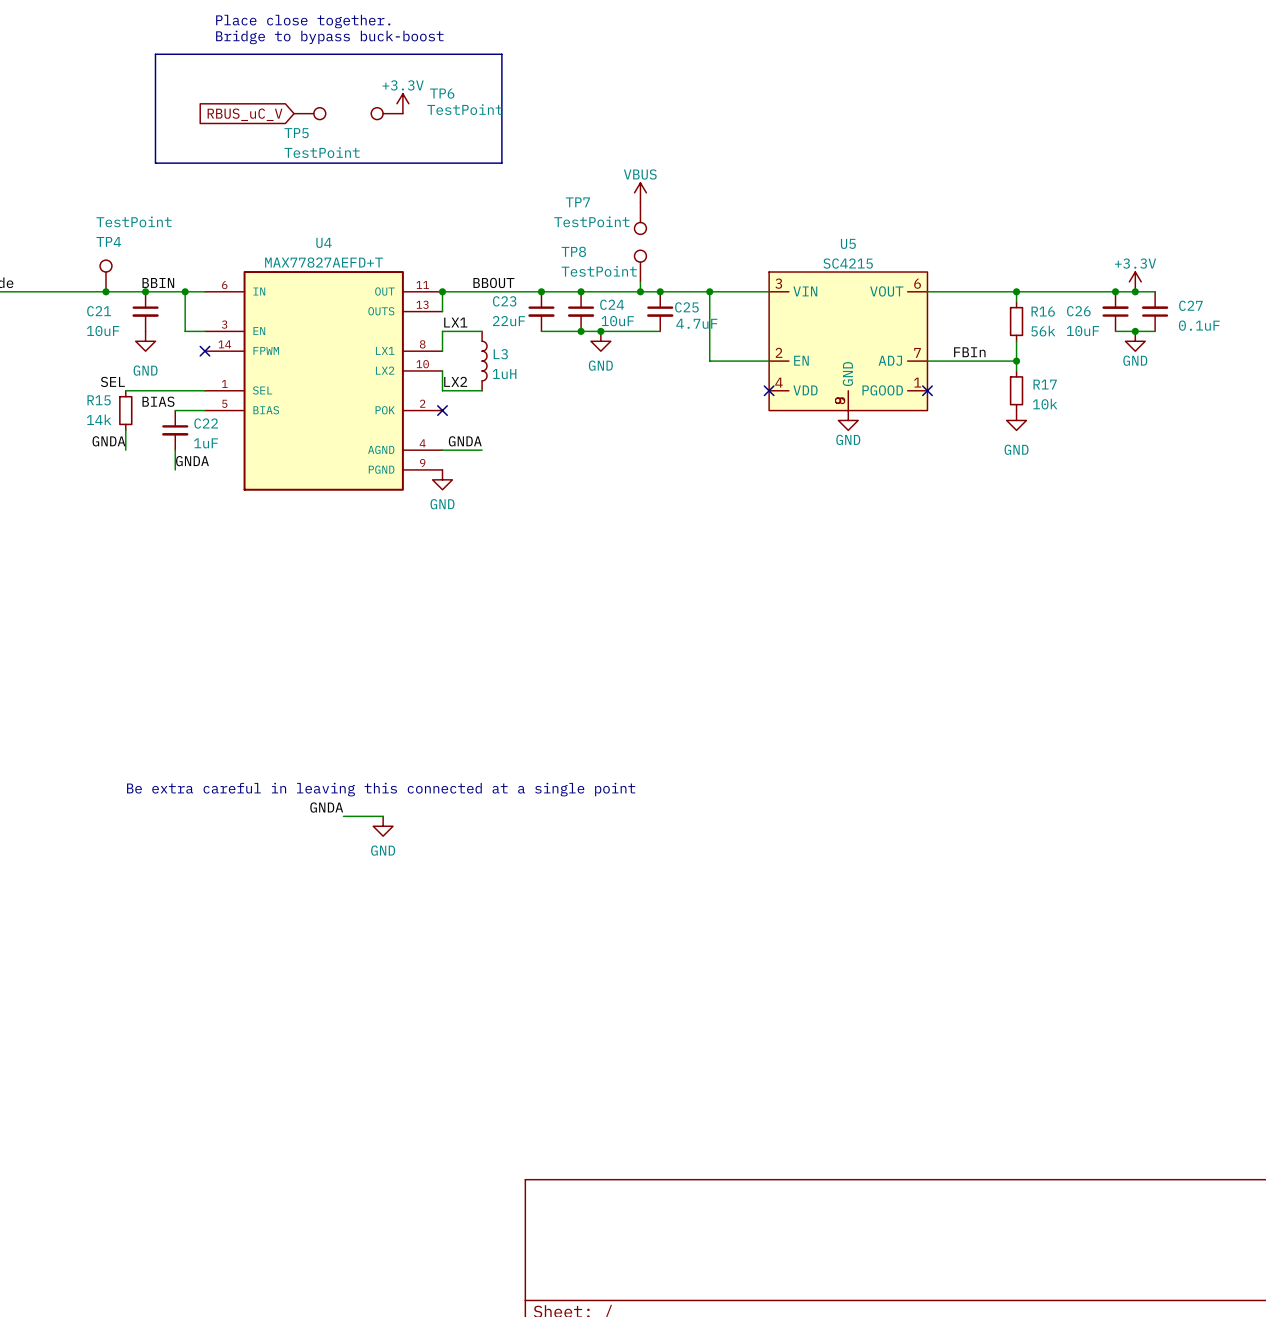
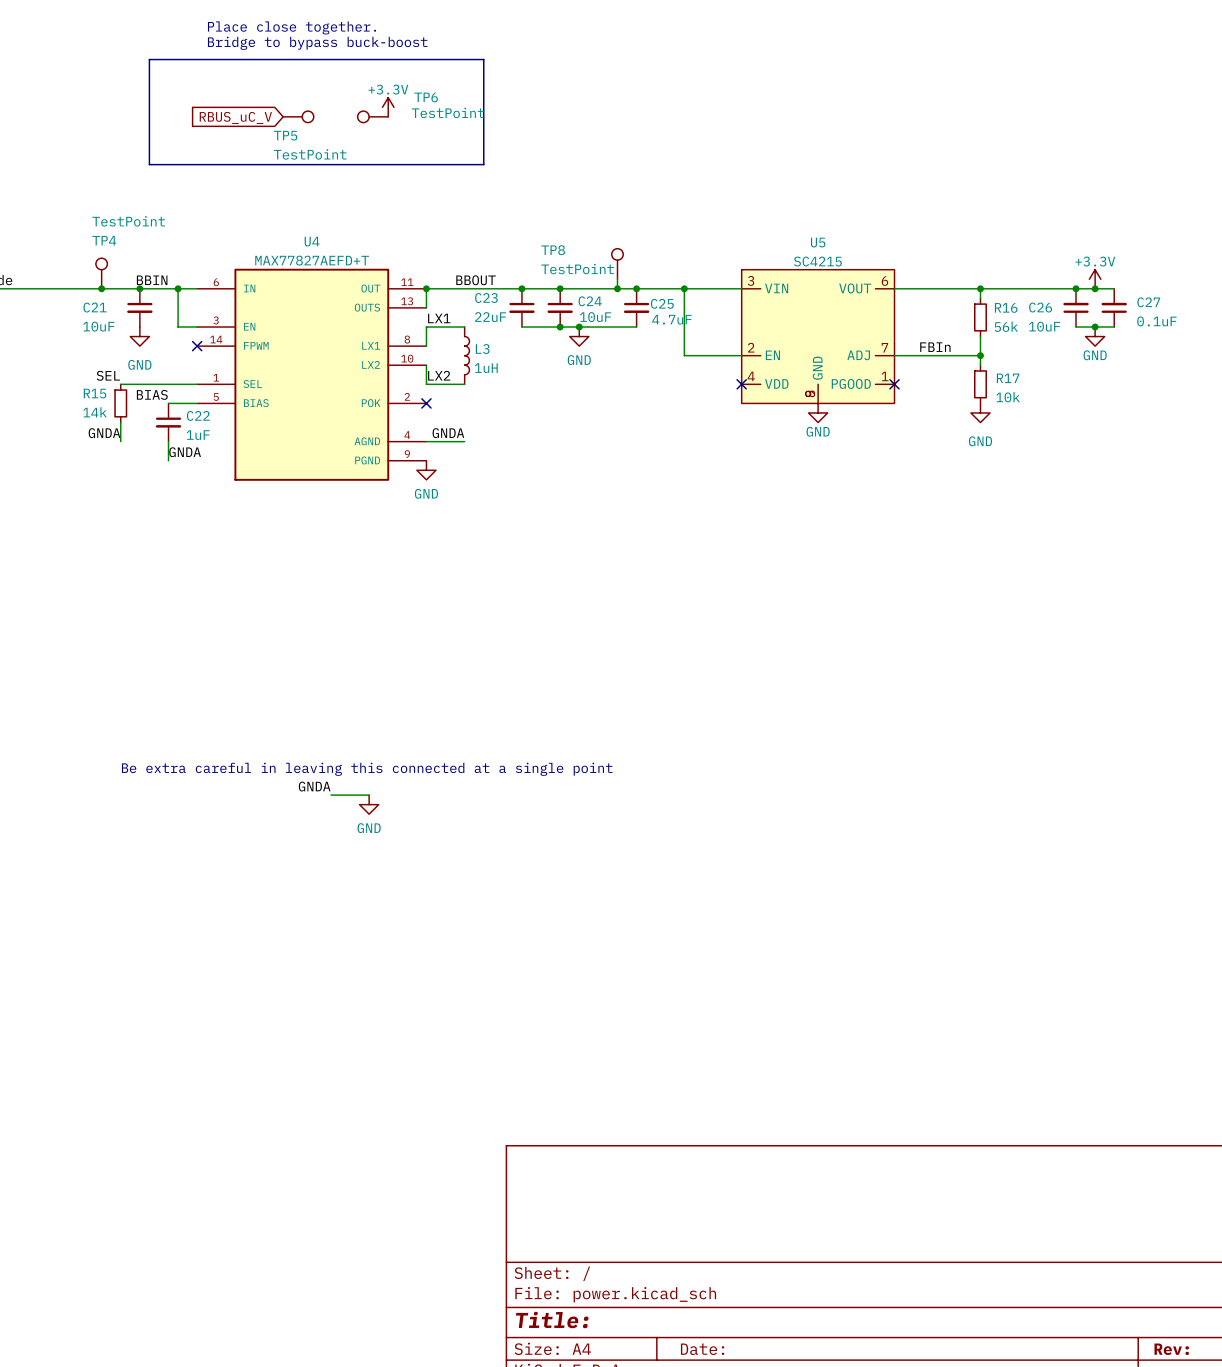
power symbol: VBUS (640, 192) -> none
TP7: TestPoint (640, 218) -> none

